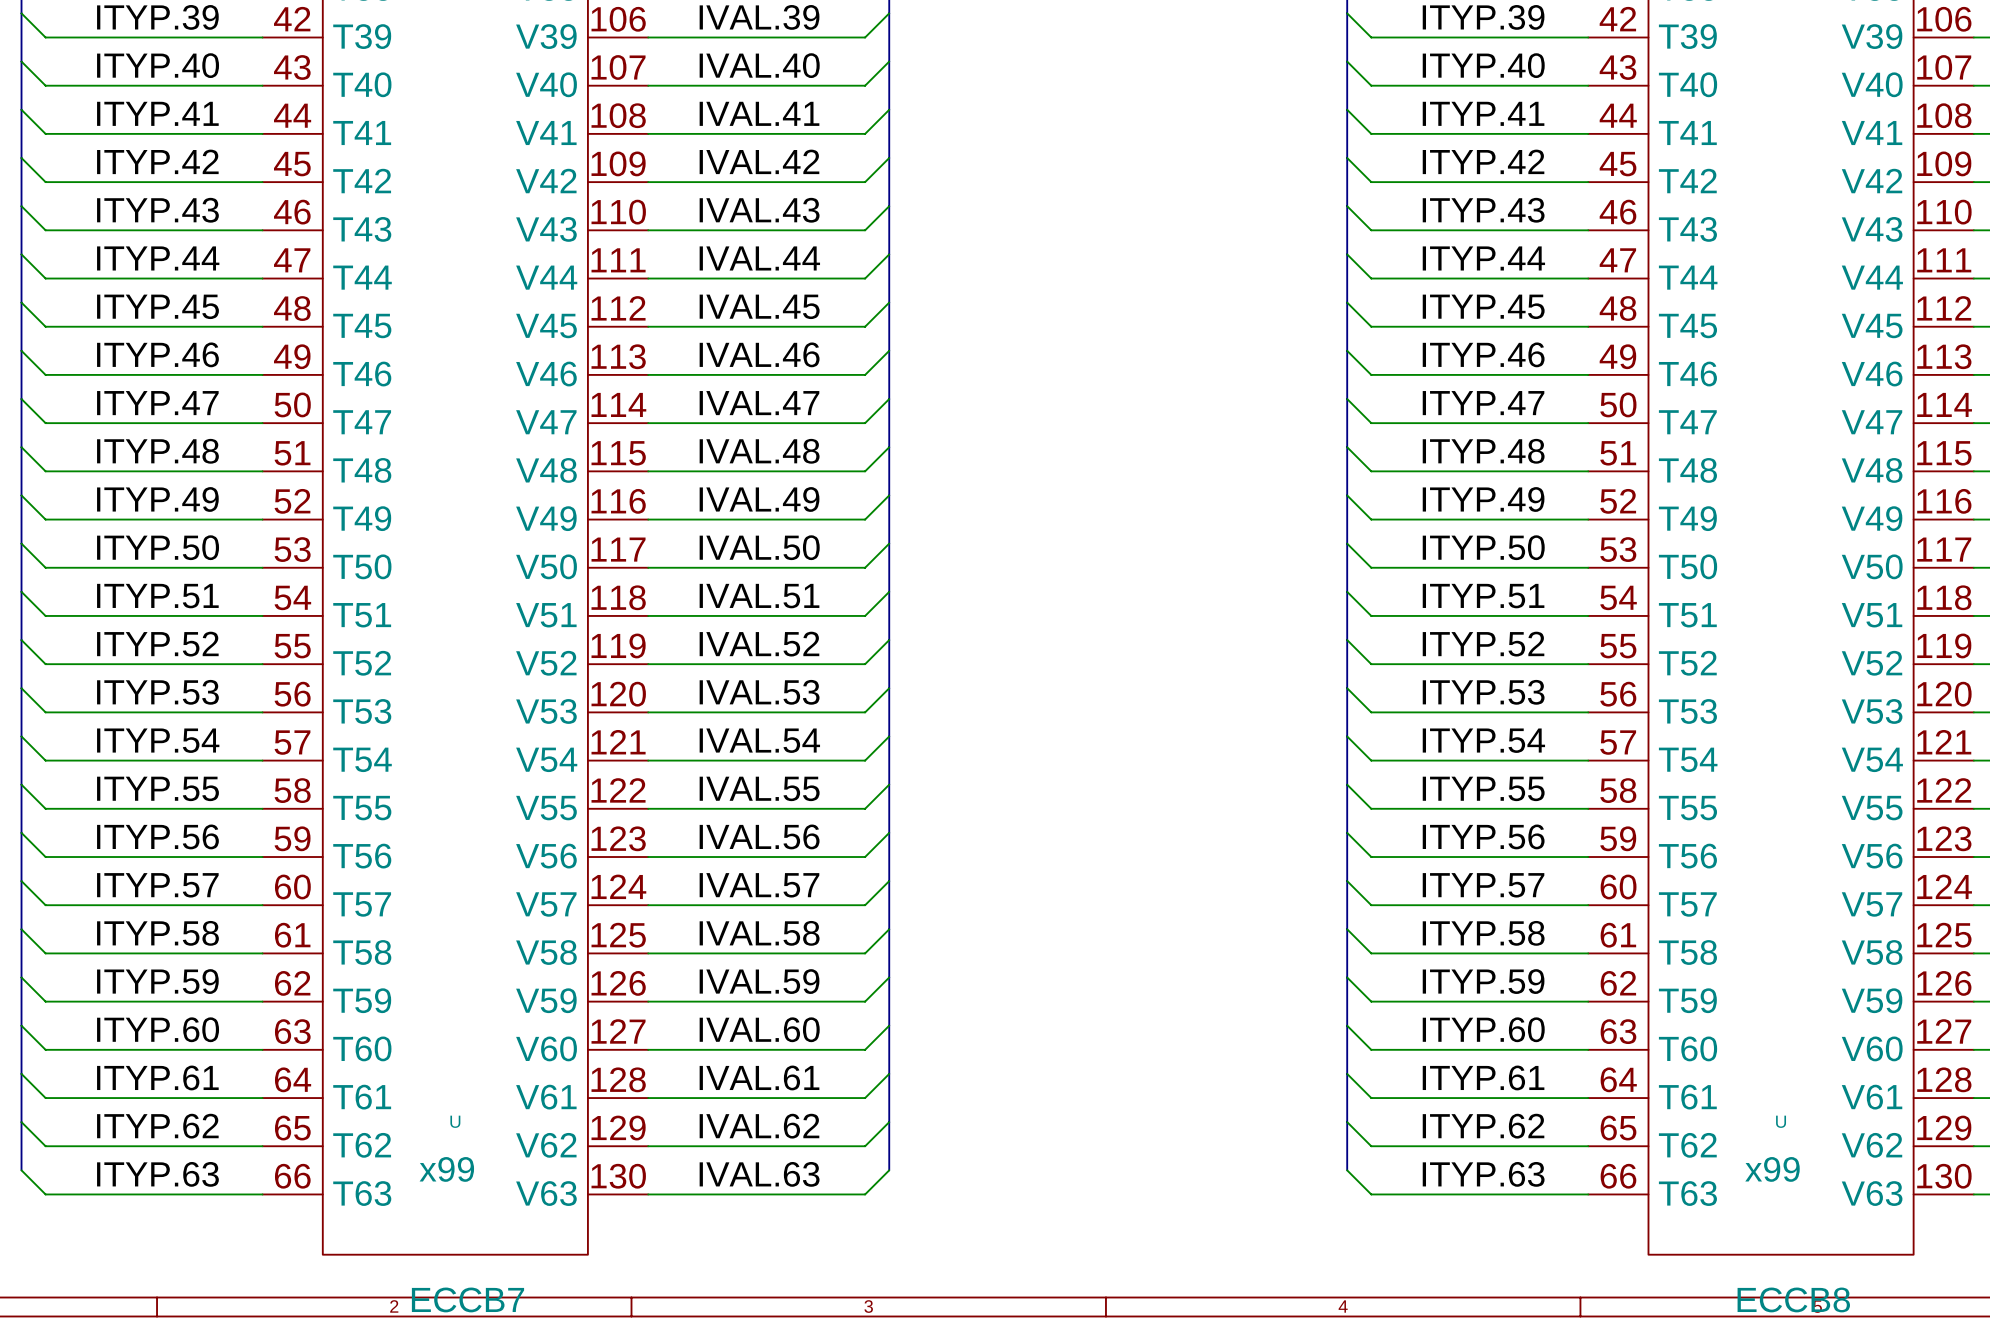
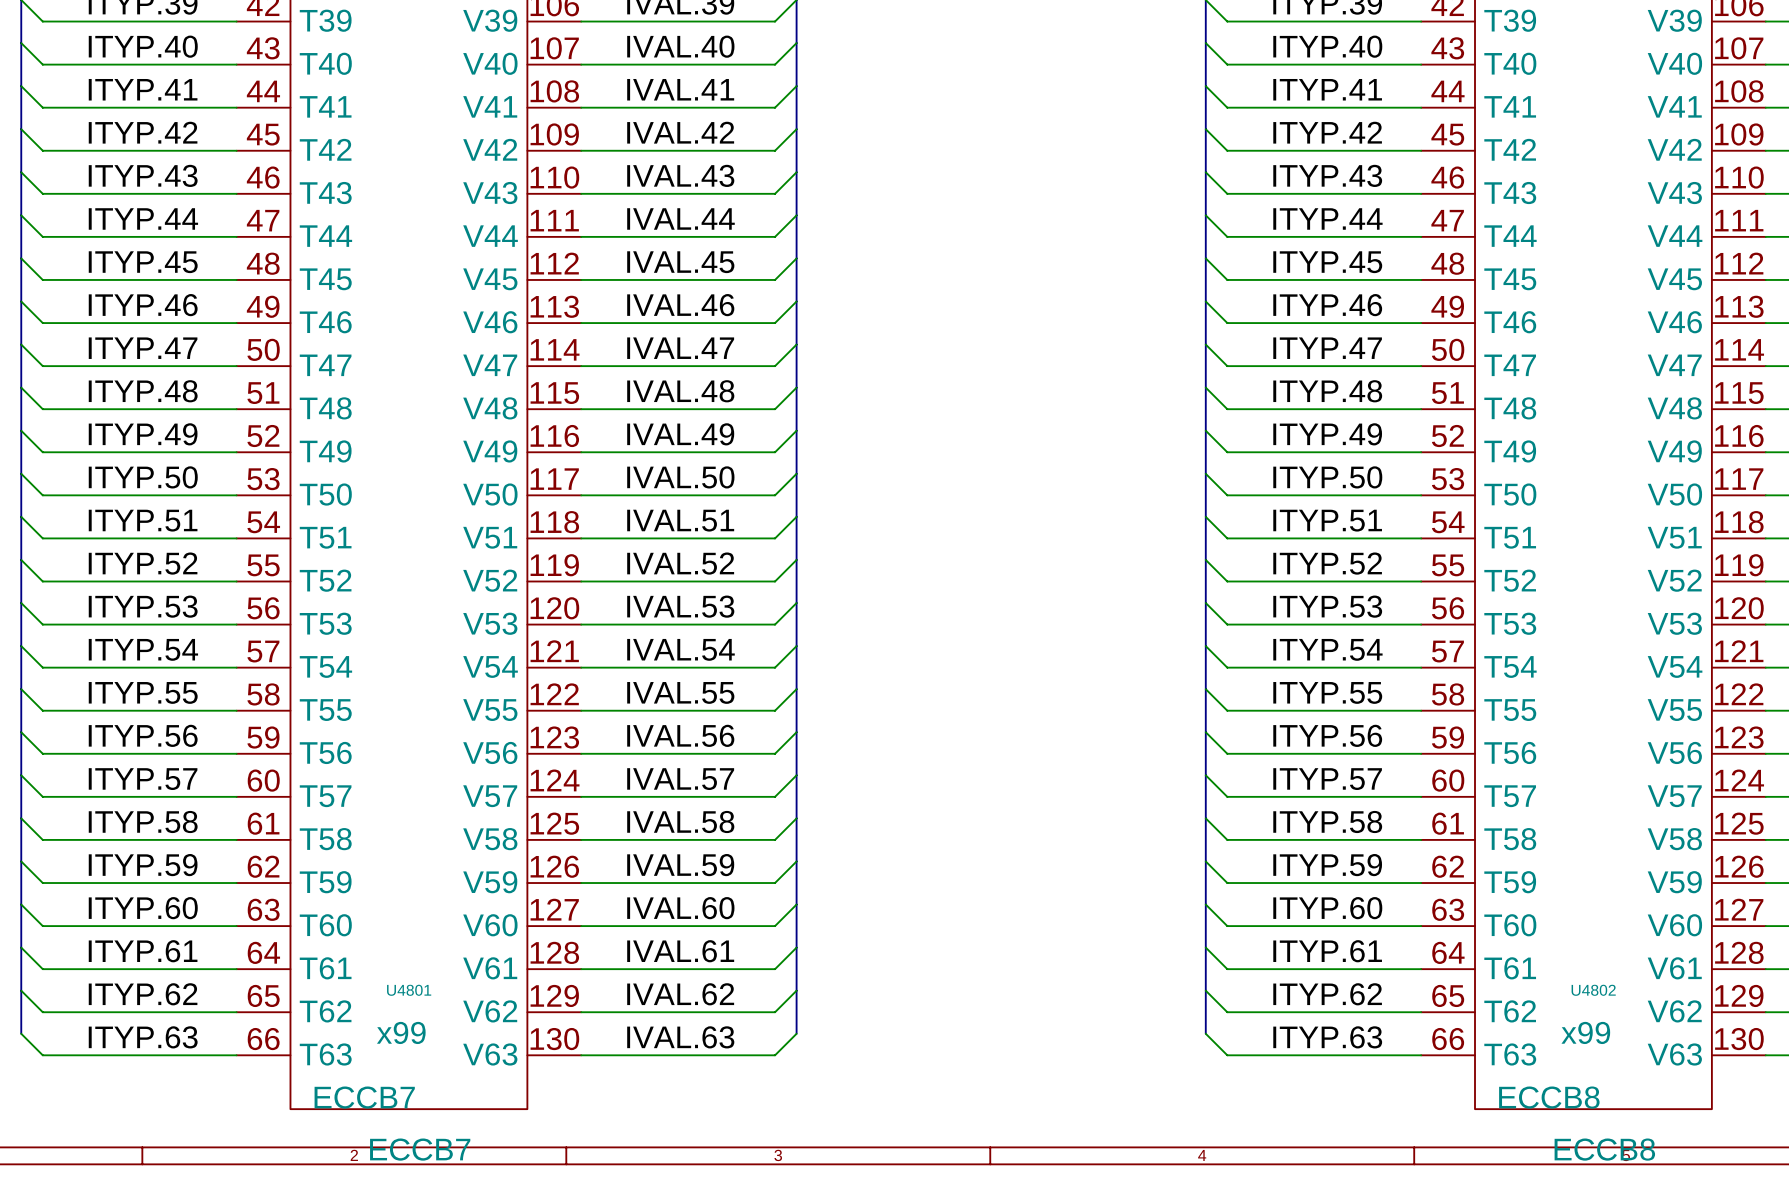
U name: U (455, 1121) -> U4801 (409, 990)
U name: U (1781, 1121) -> U4802 (1593, 990)
U value: none -> ECCB7 (364, 1097)
U value: none -> ECCB8 (1549, 1097)

